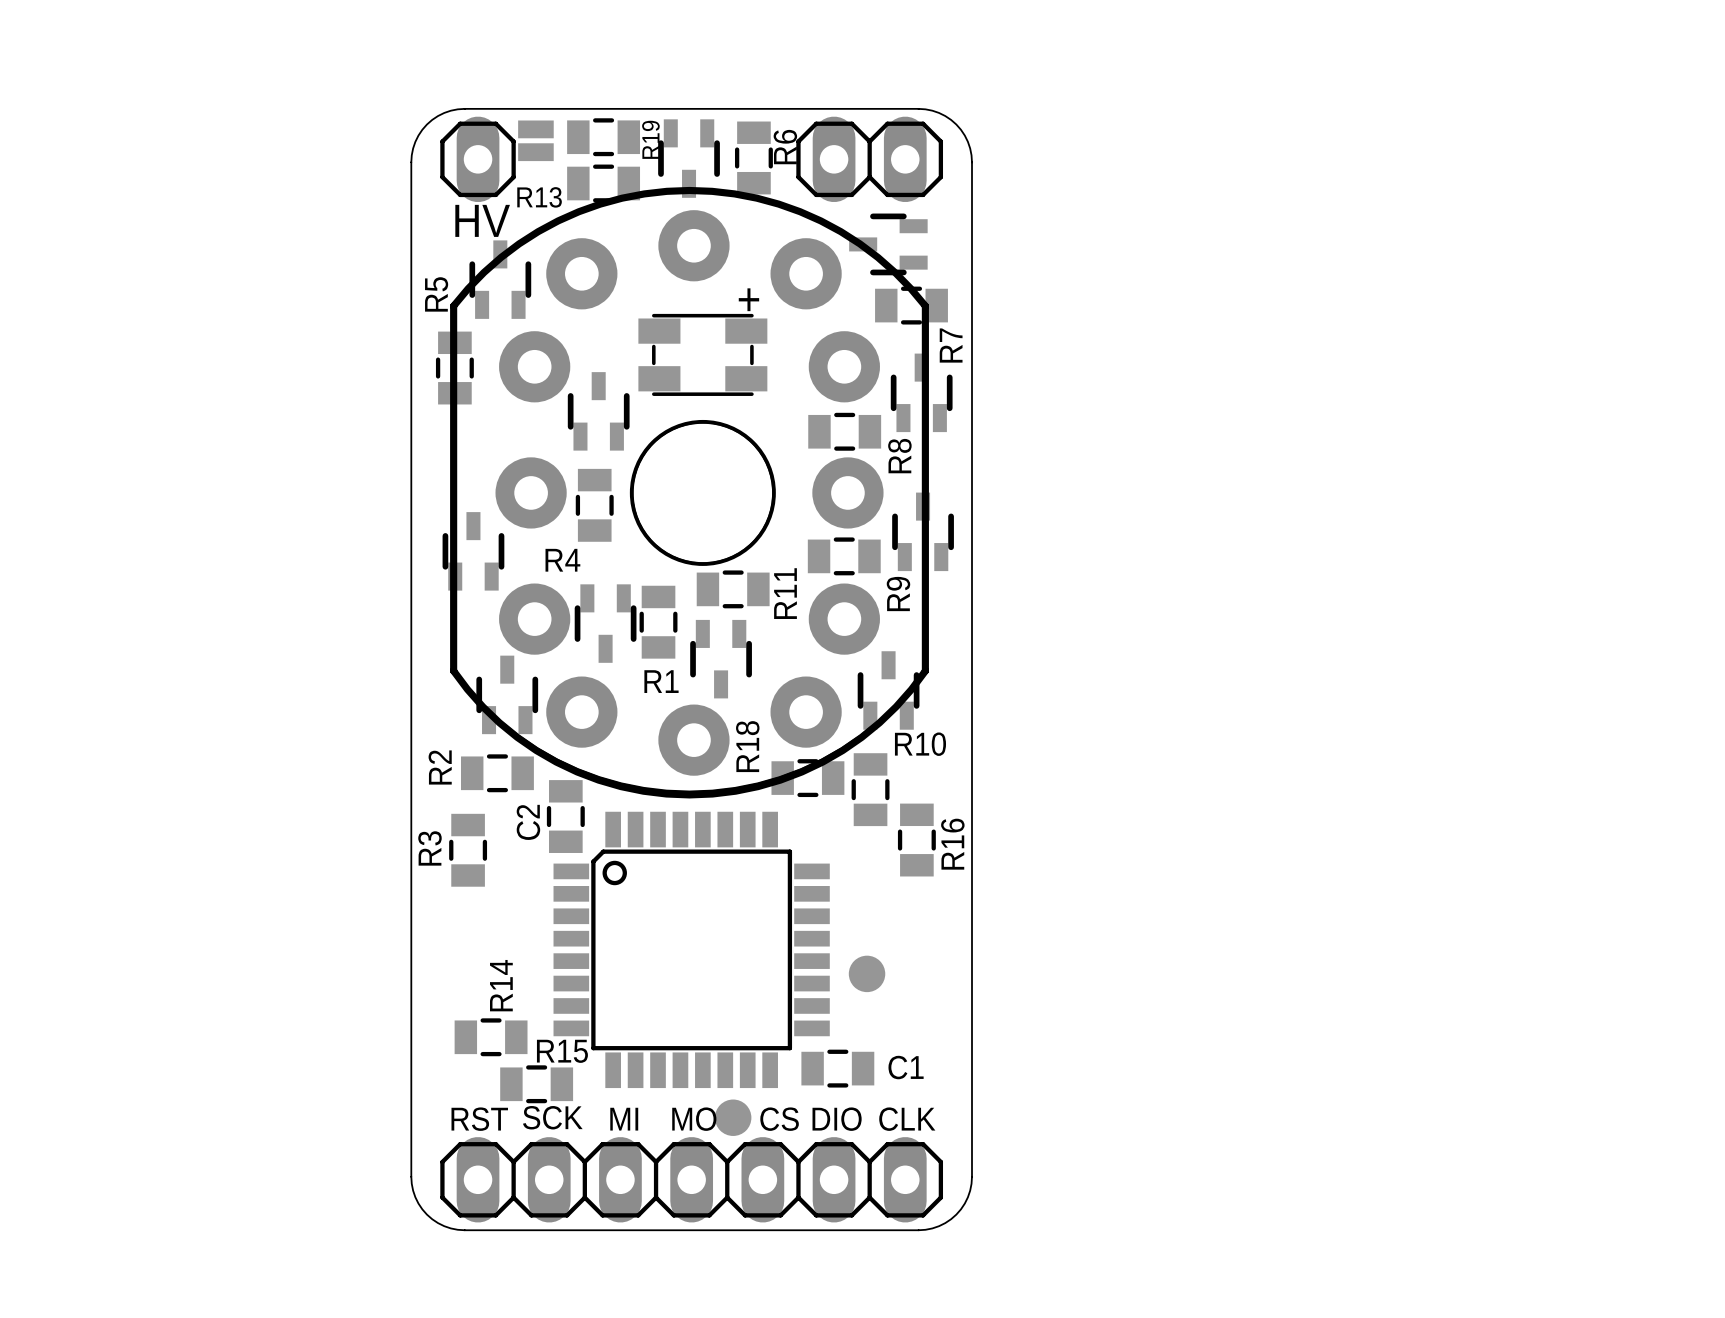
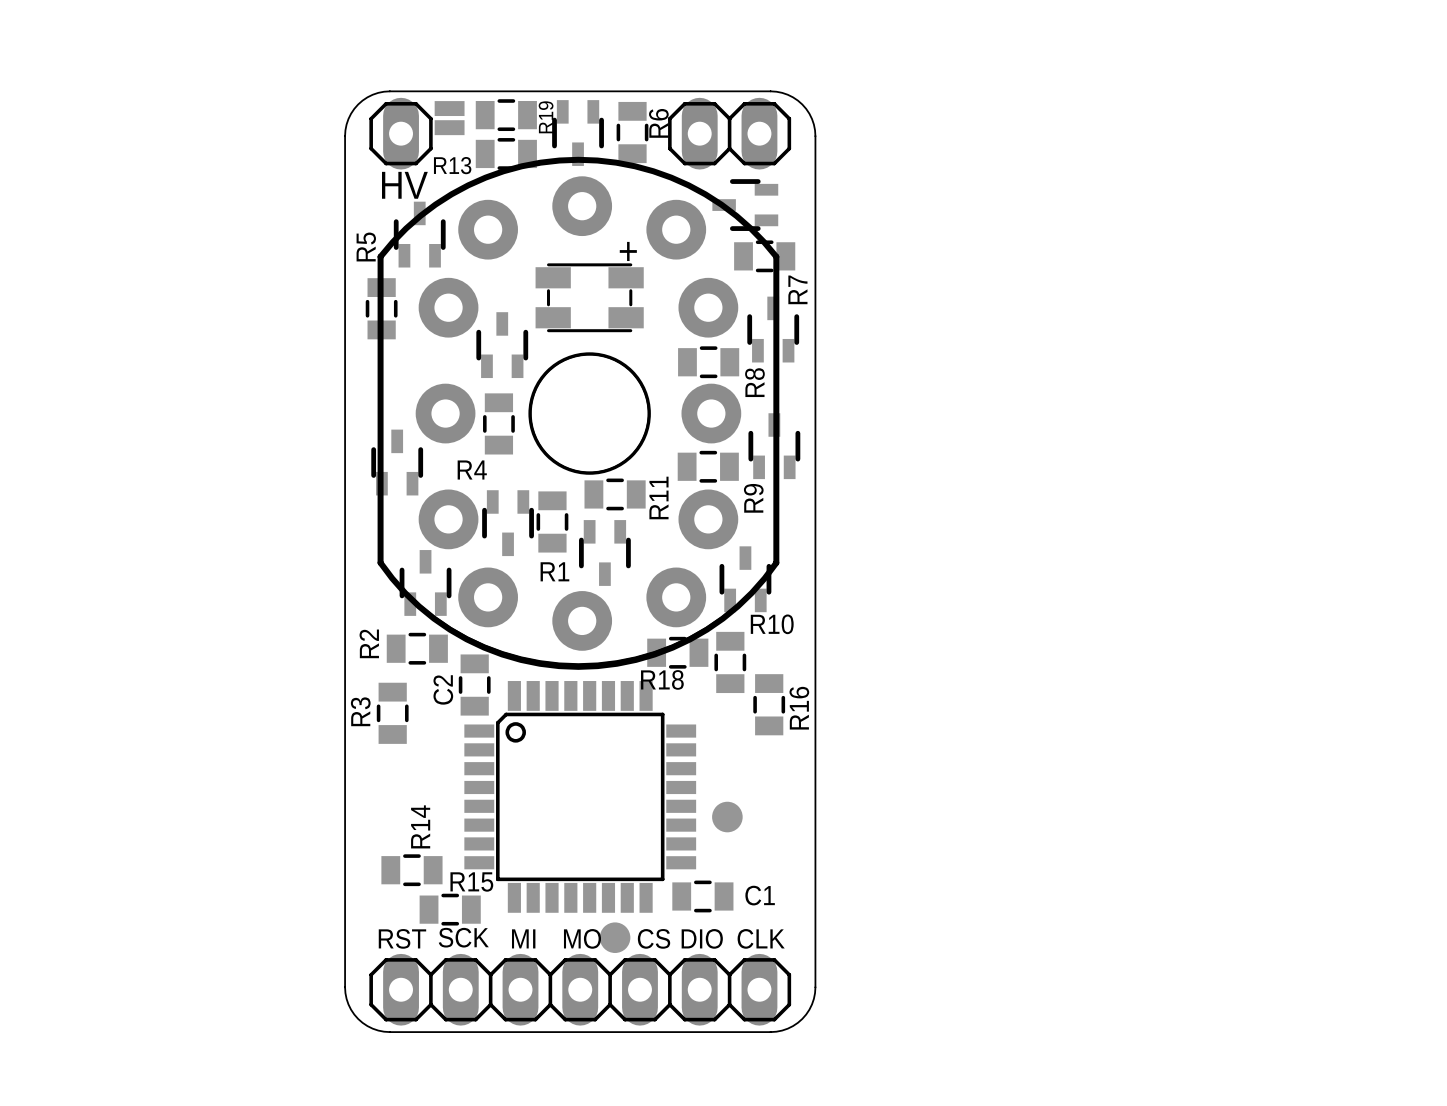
R18 name rotation: 0° (747, 746) -> 90° clockwise (662, 679)
R18 name position: R18 (747, 746) -> R18 (662, 679)

